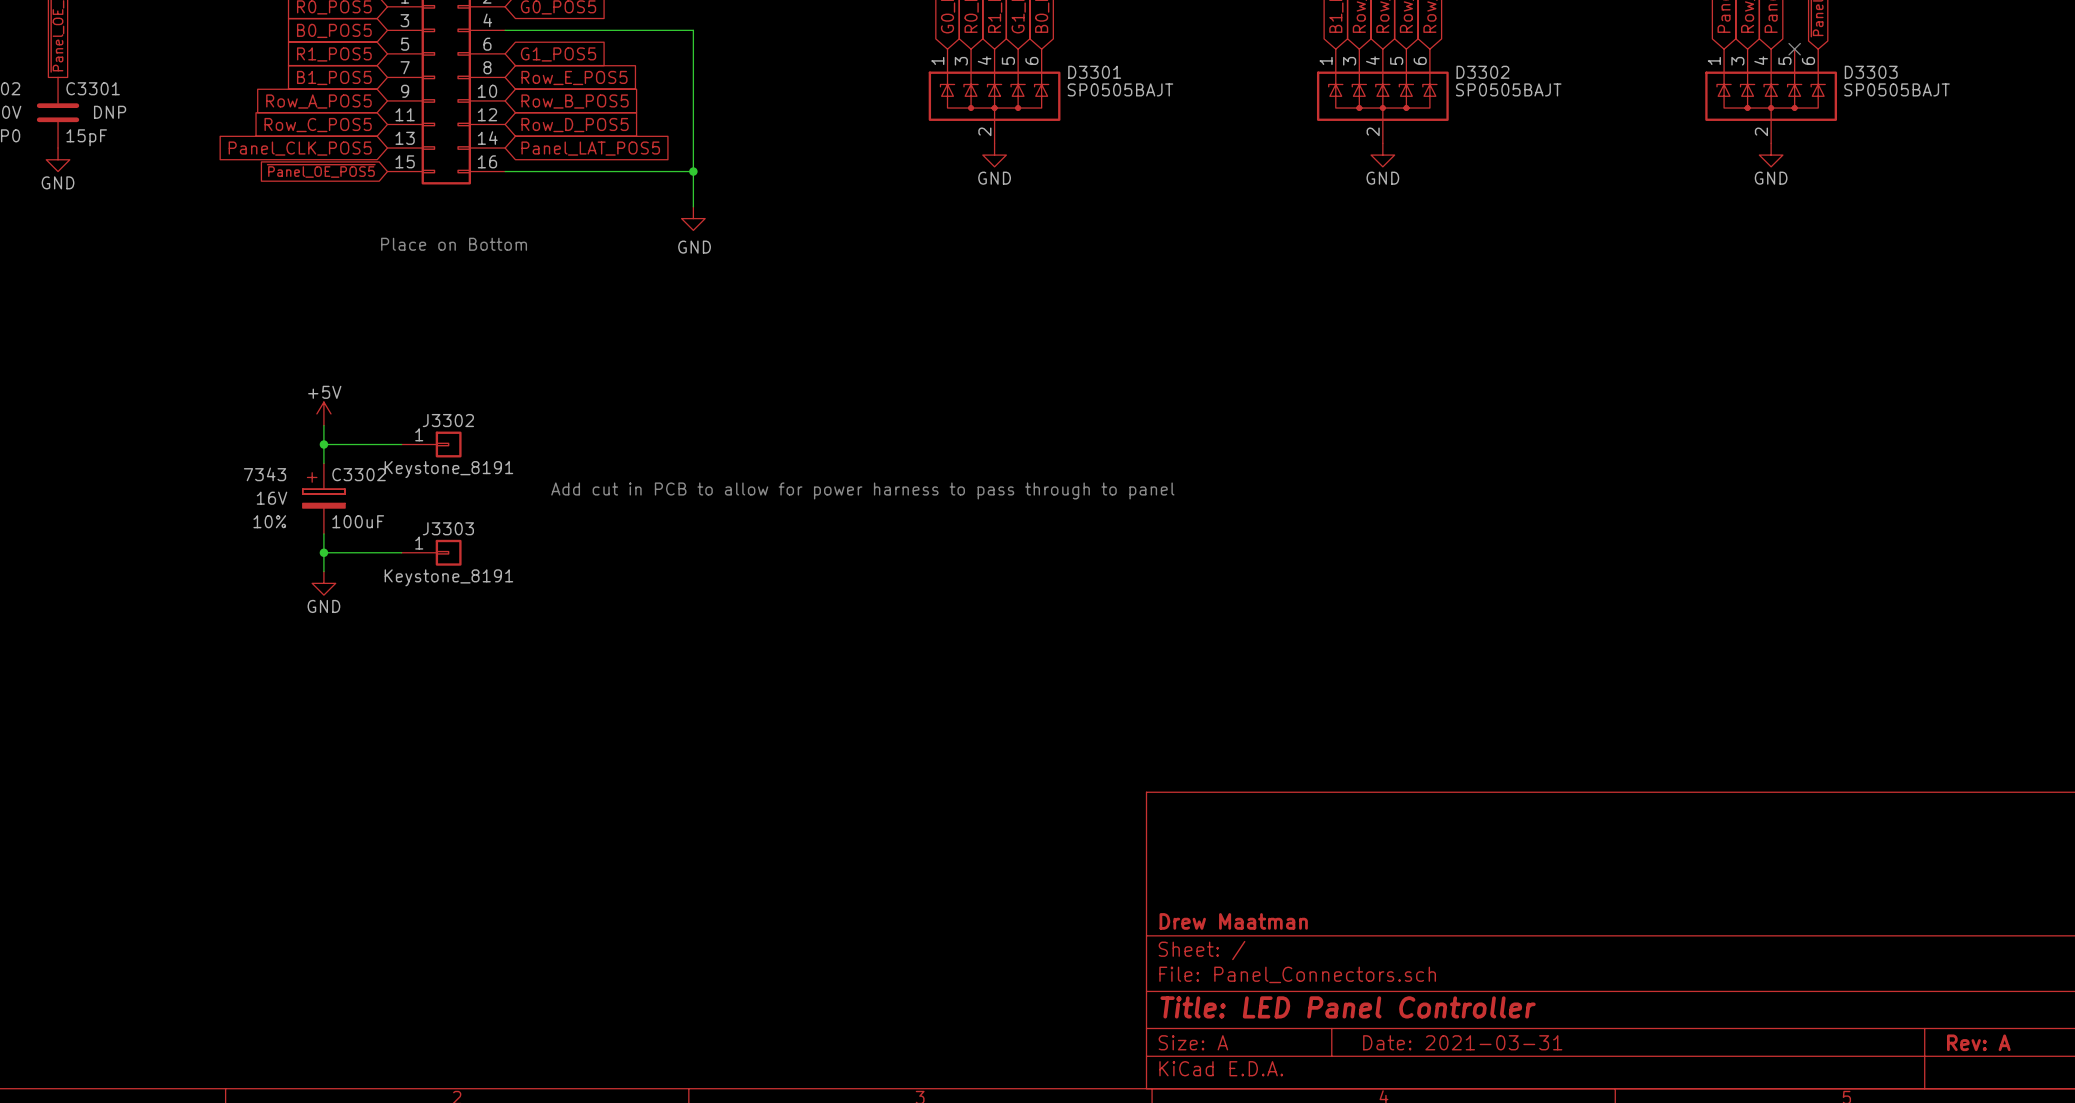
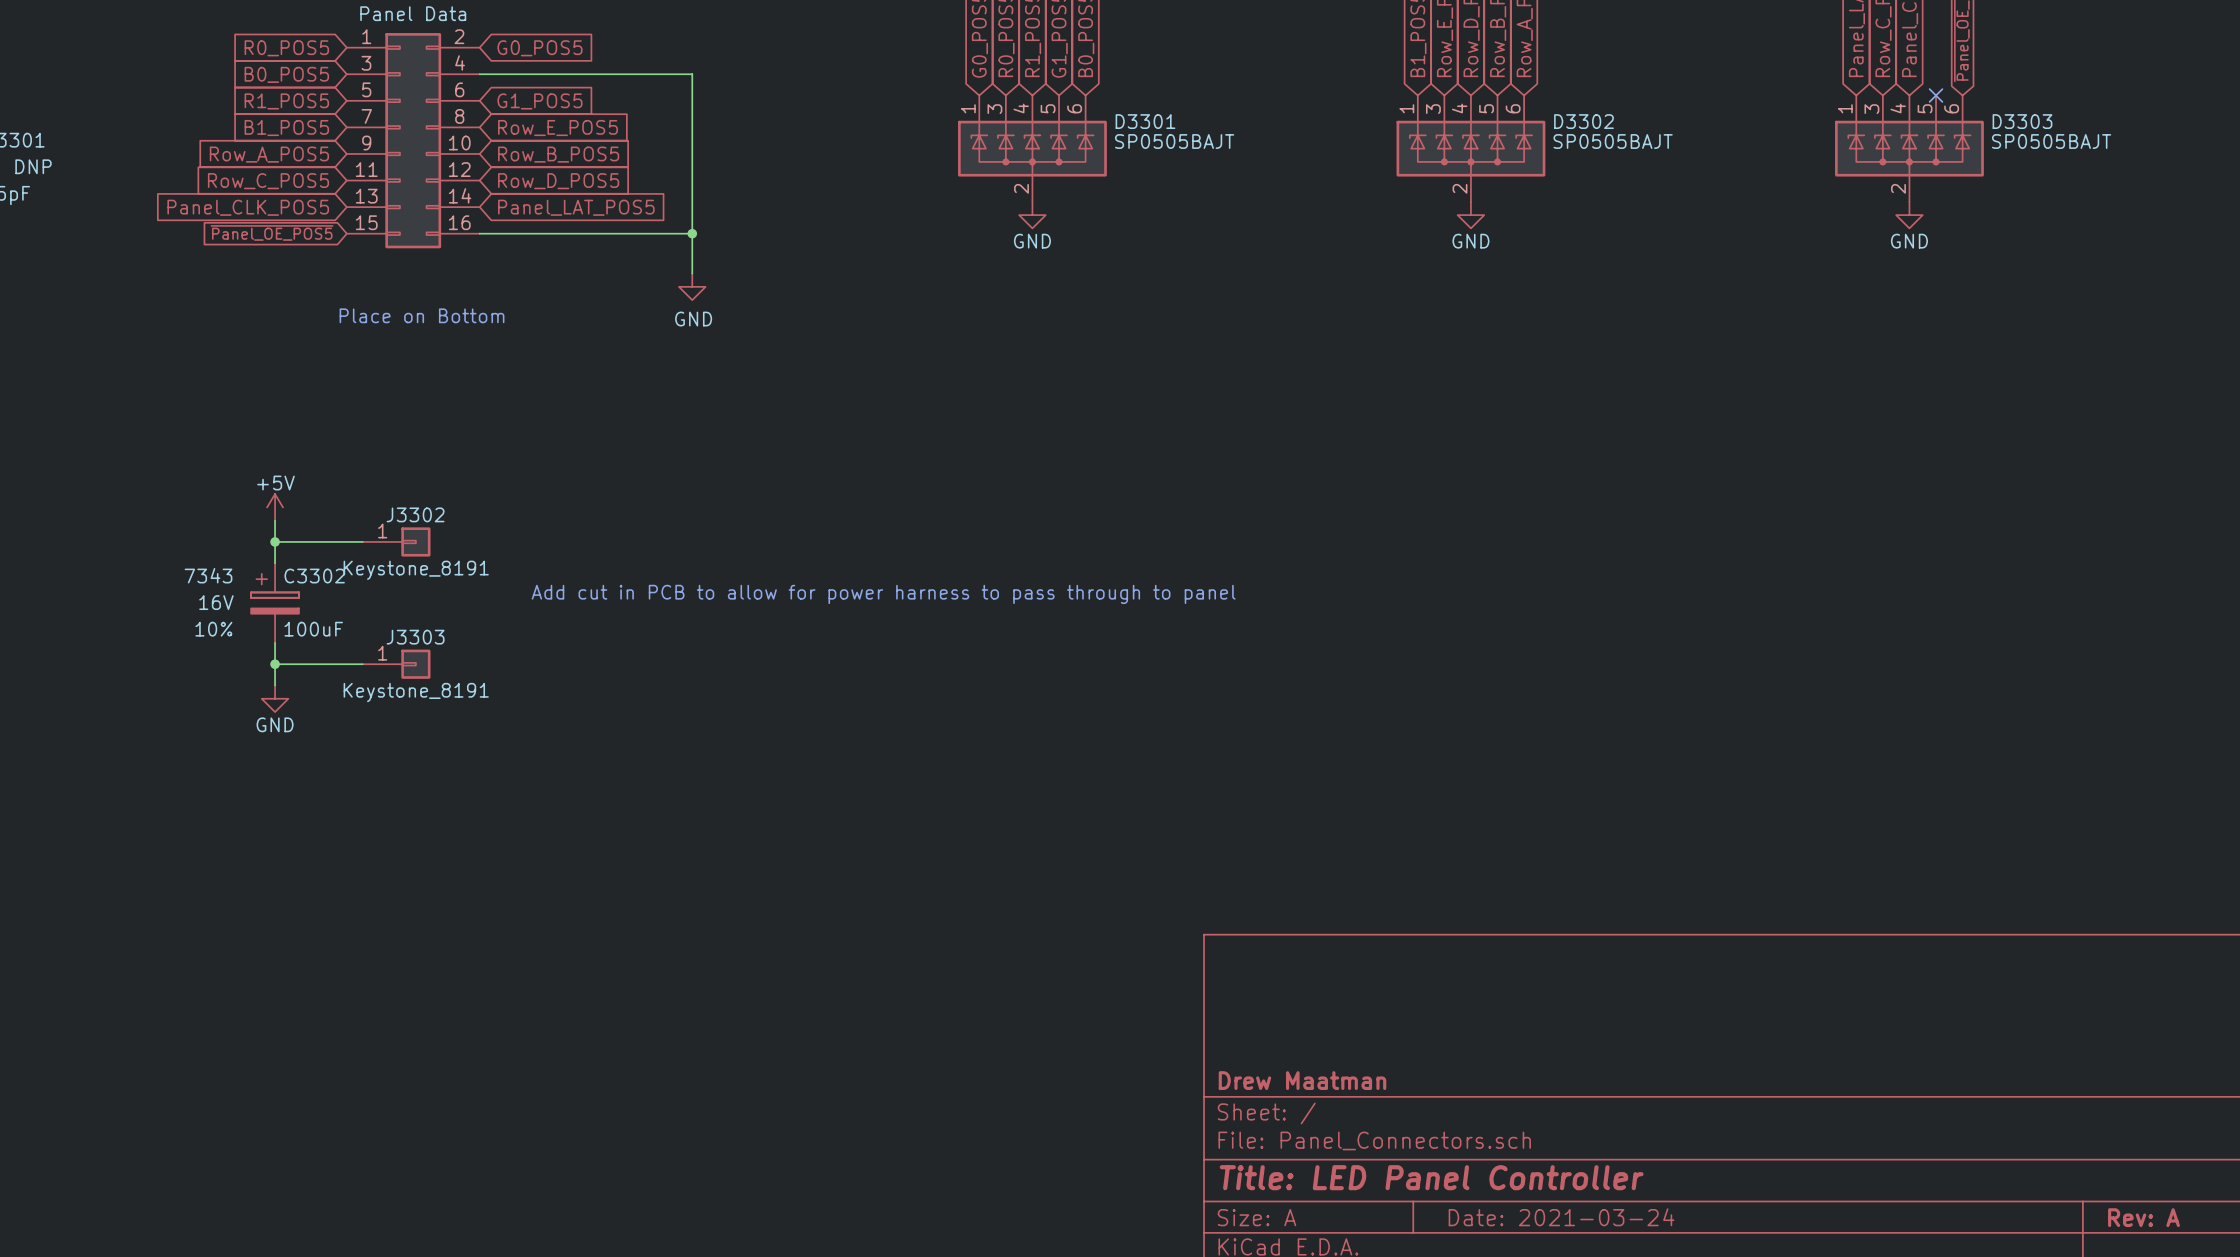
title block: Date: 2021-03-31 (1462, 1042) -> Date: 2021-03-24 (1561, 1217)

